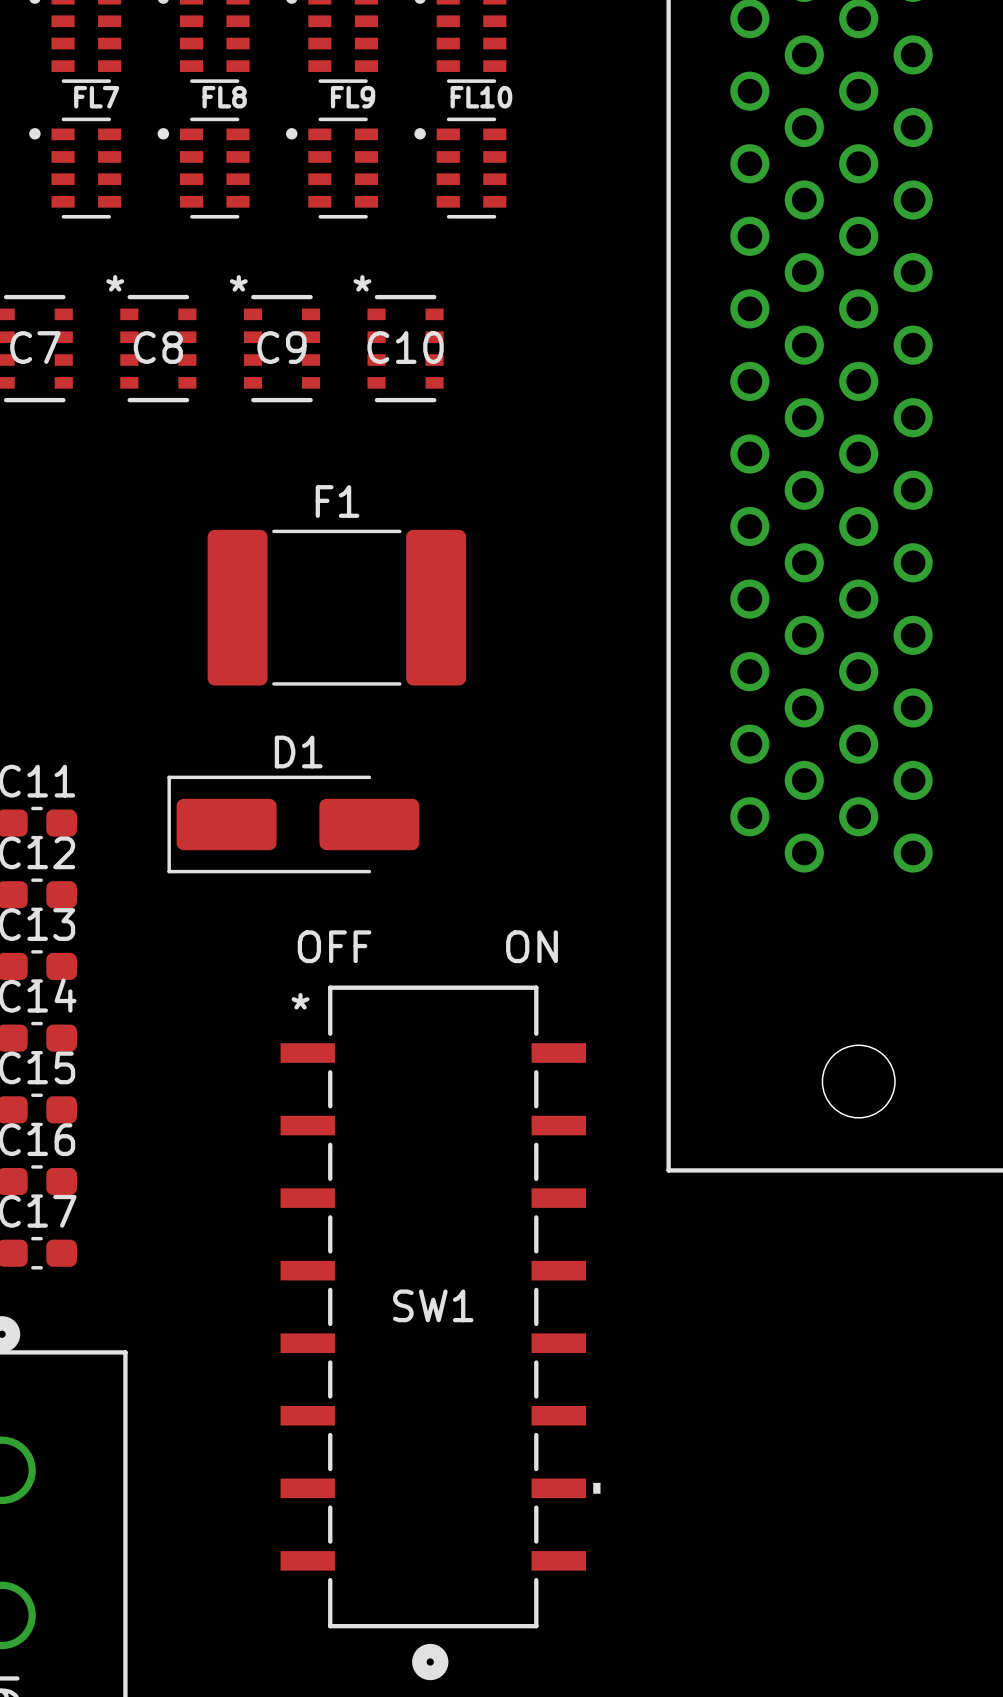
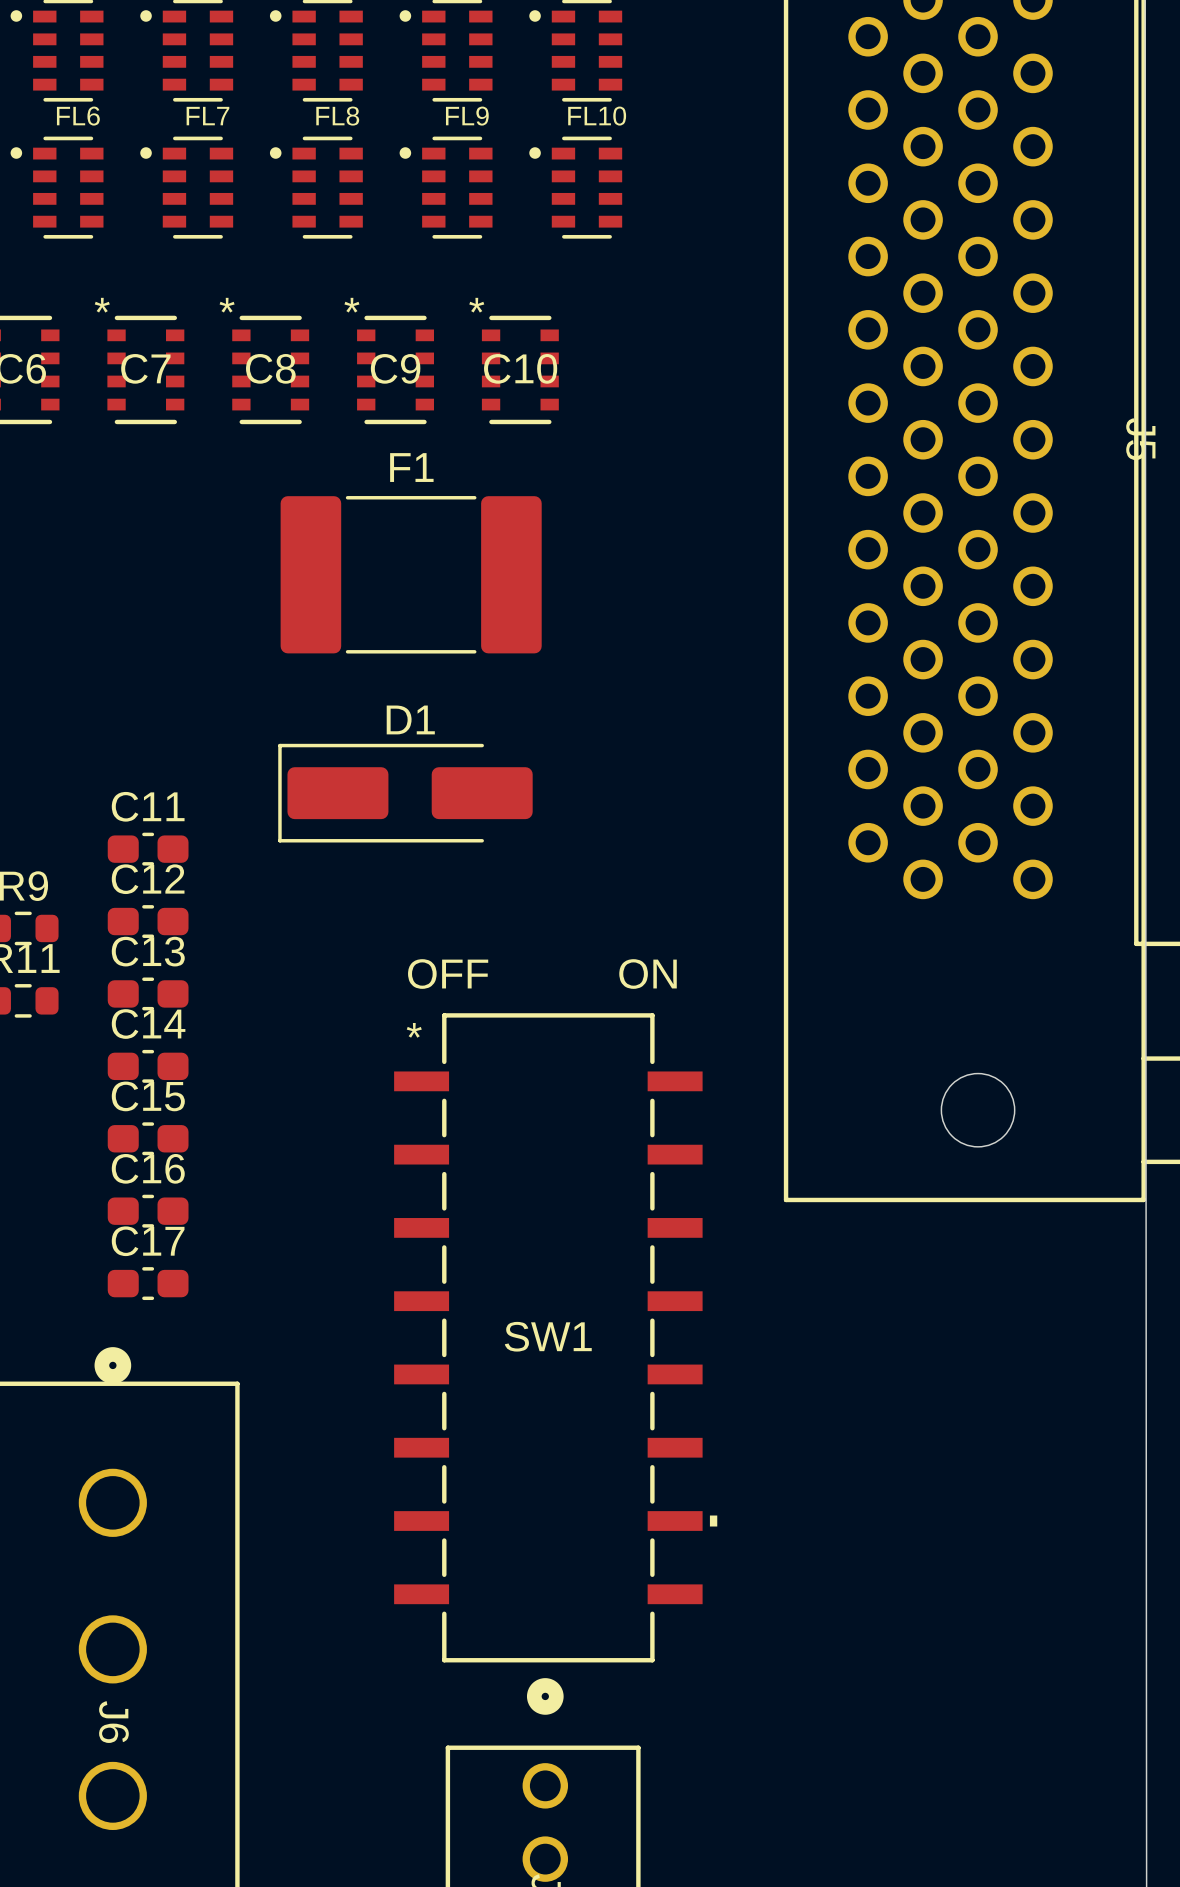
F1 position: (336, 607) -> (411, 574)
D1 position: (293, 824) -> (405, 793)

